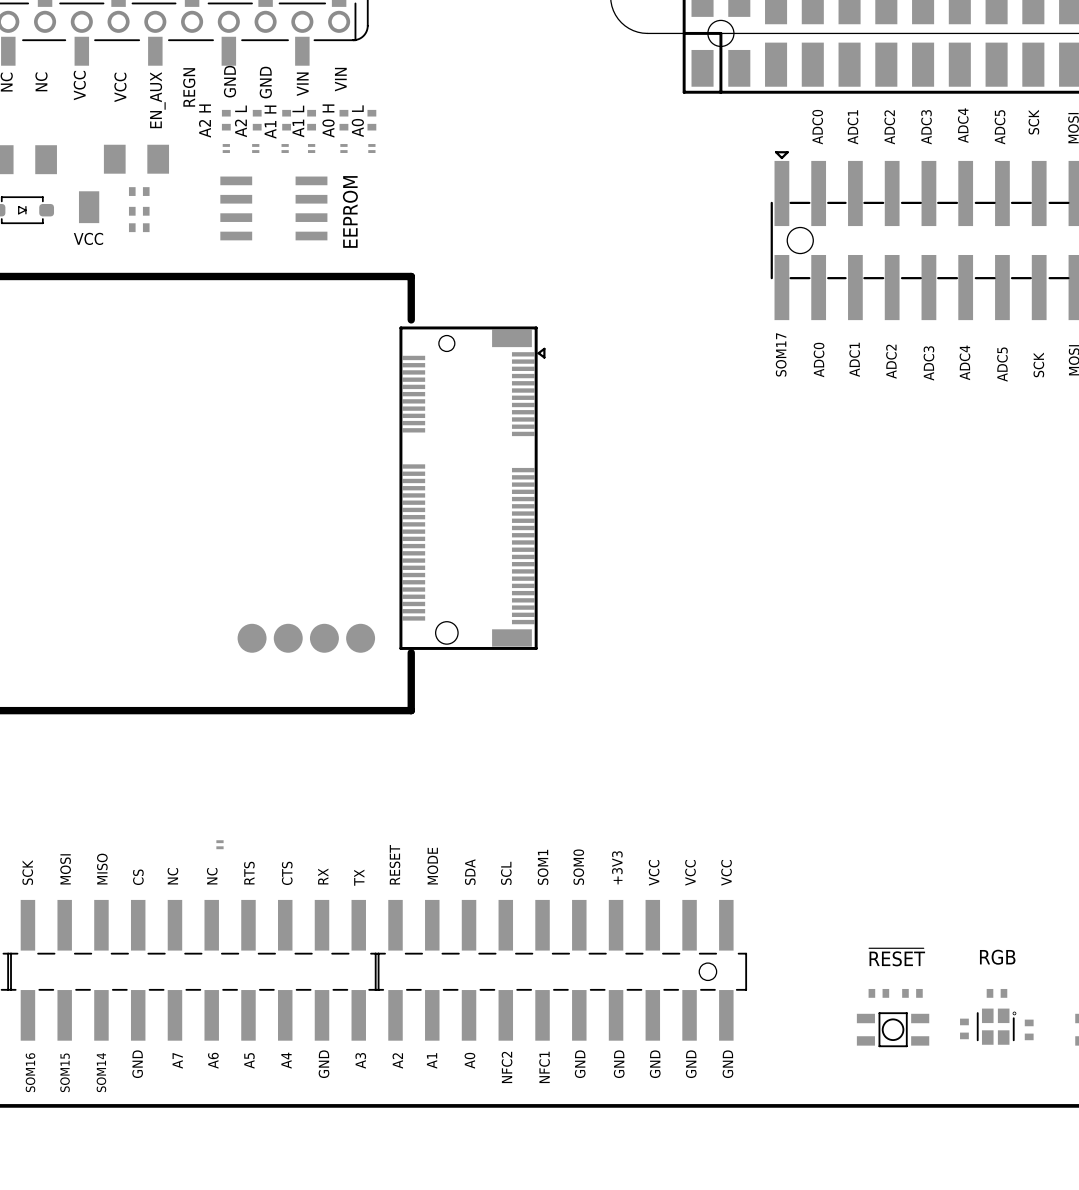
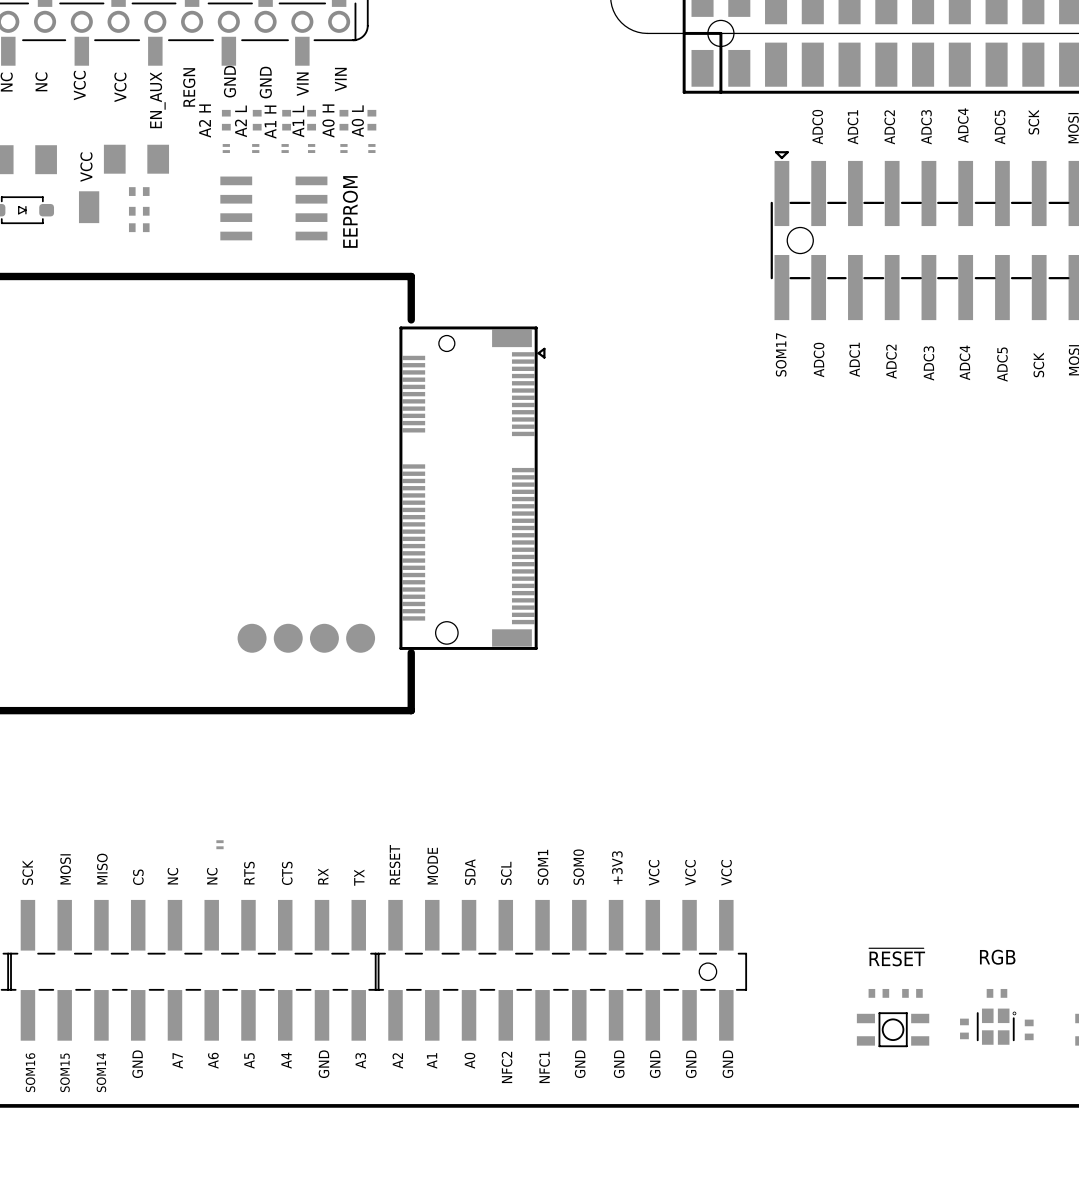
text rotation: 0° (88, 238) -> 90° counterclockwise (86, 167)
text position: VCC (88, 238) -> VCC (86, 167)

